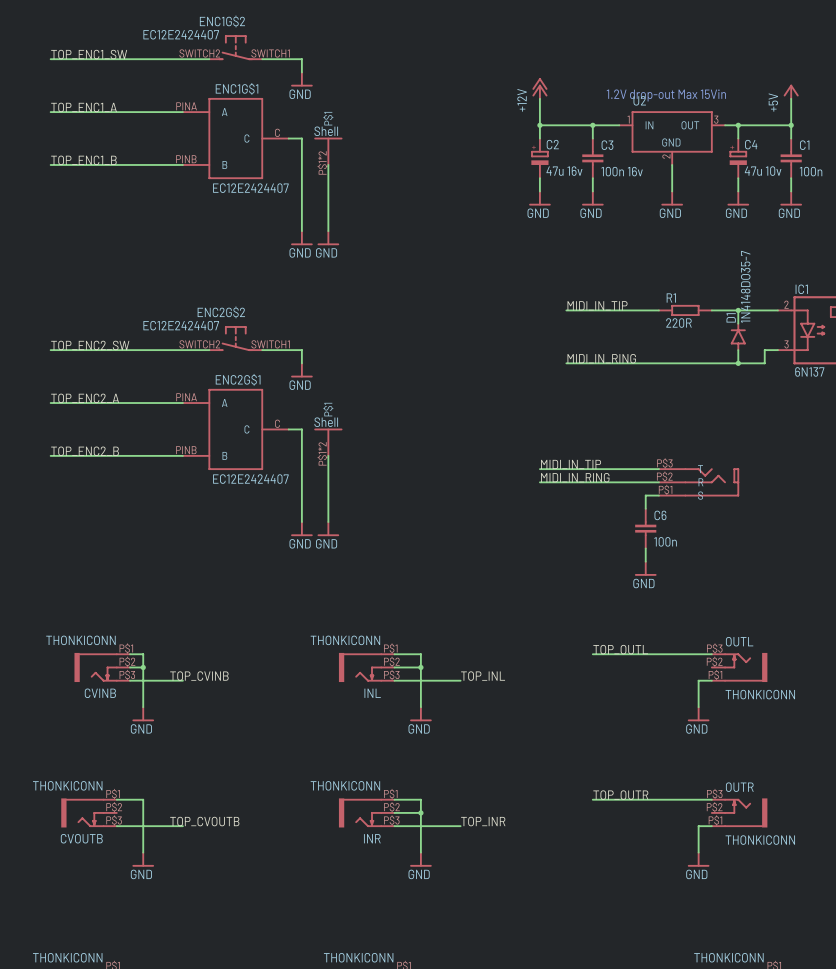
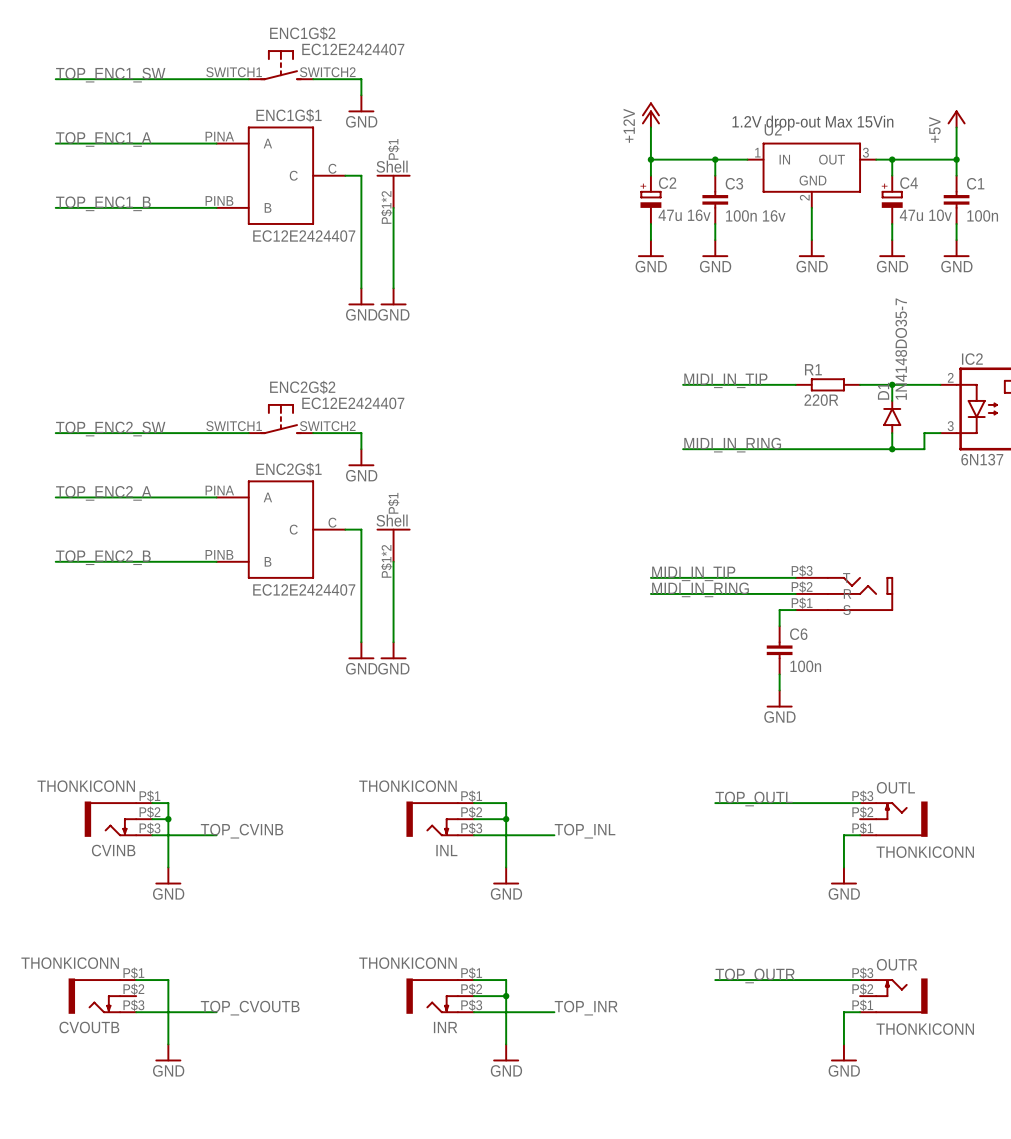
ENC1G$2 flip: as is (235, 47) -> left-right (280, 65)
IC1 name: IC1 (801, 289) -> IC2 (972, 359)
ENC2G$2 flip: as is (235, 338) -> left-right (280, 419)

